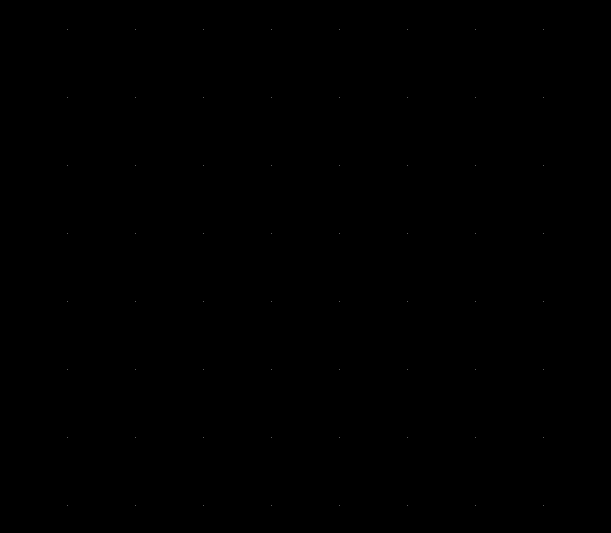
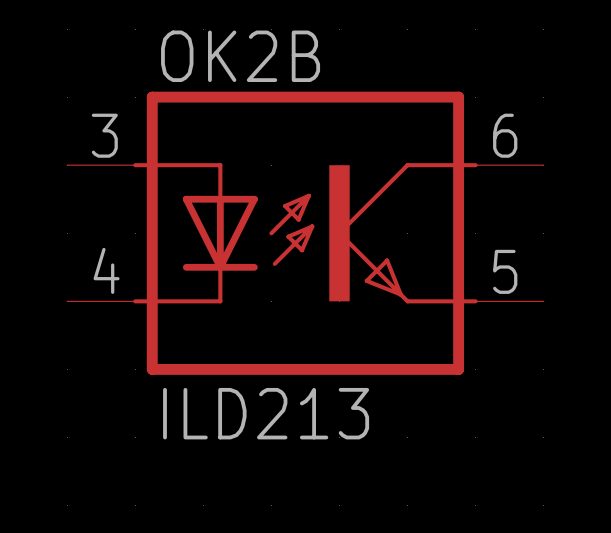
OK2B: none -> ILD213 (305, 233)

